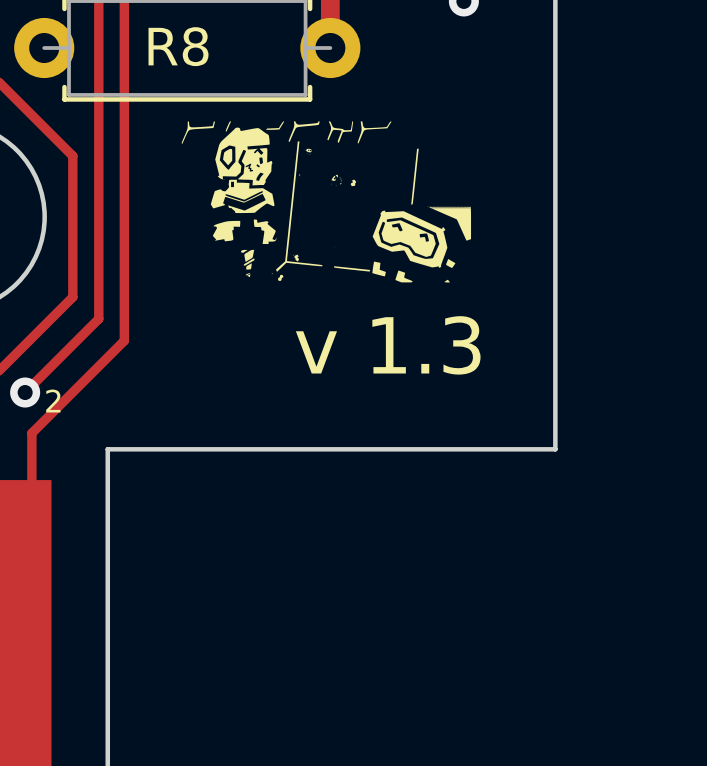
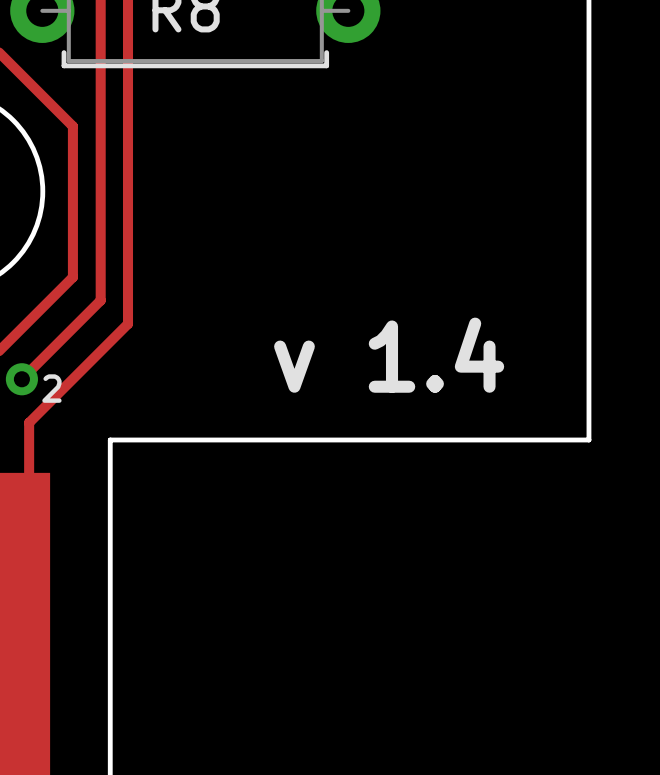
drawing: [181, 121, 472, 283] -> none
text: v 1.3 (388, 345) -> v 1.4 (389, 355)

